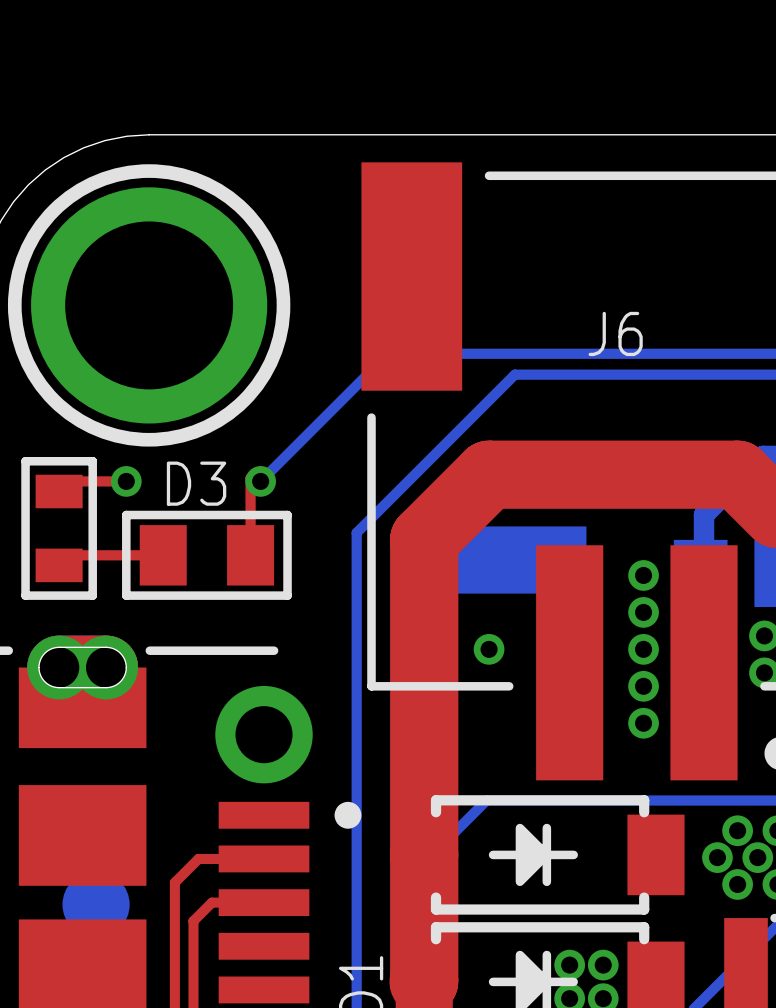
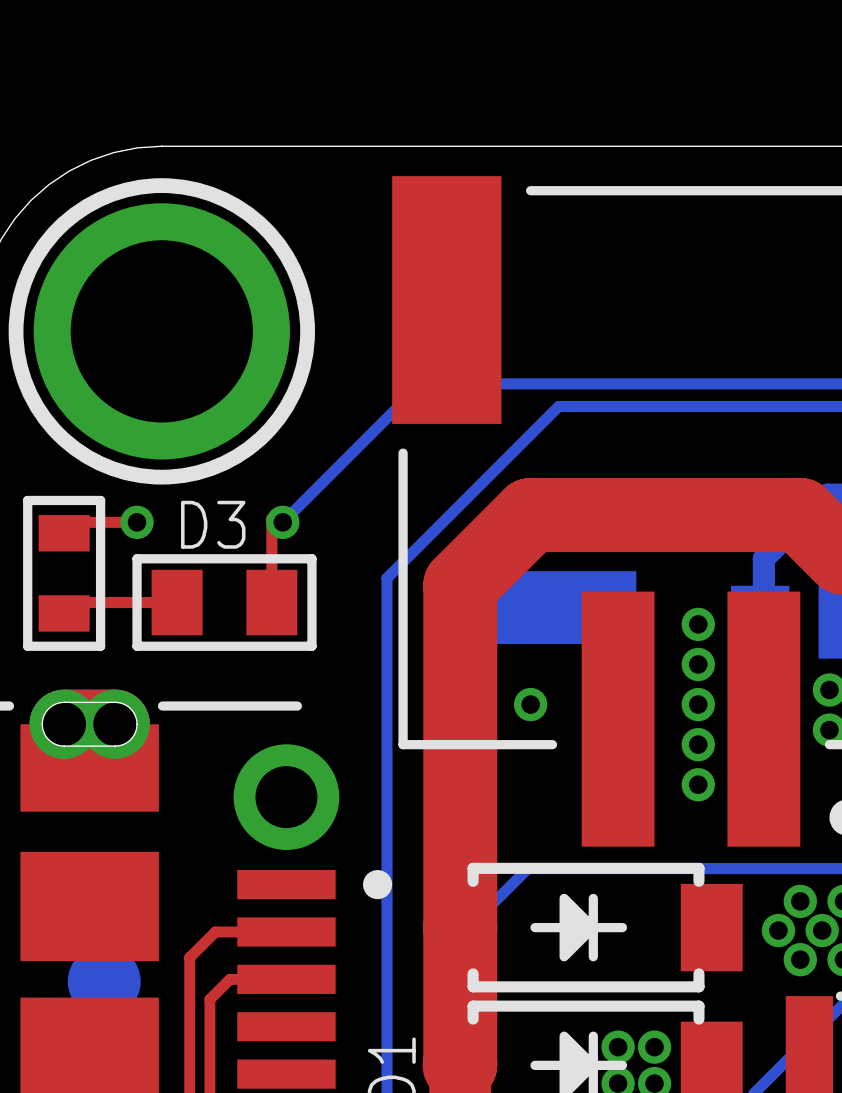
J6 name: J6 (615, 333) -> none

